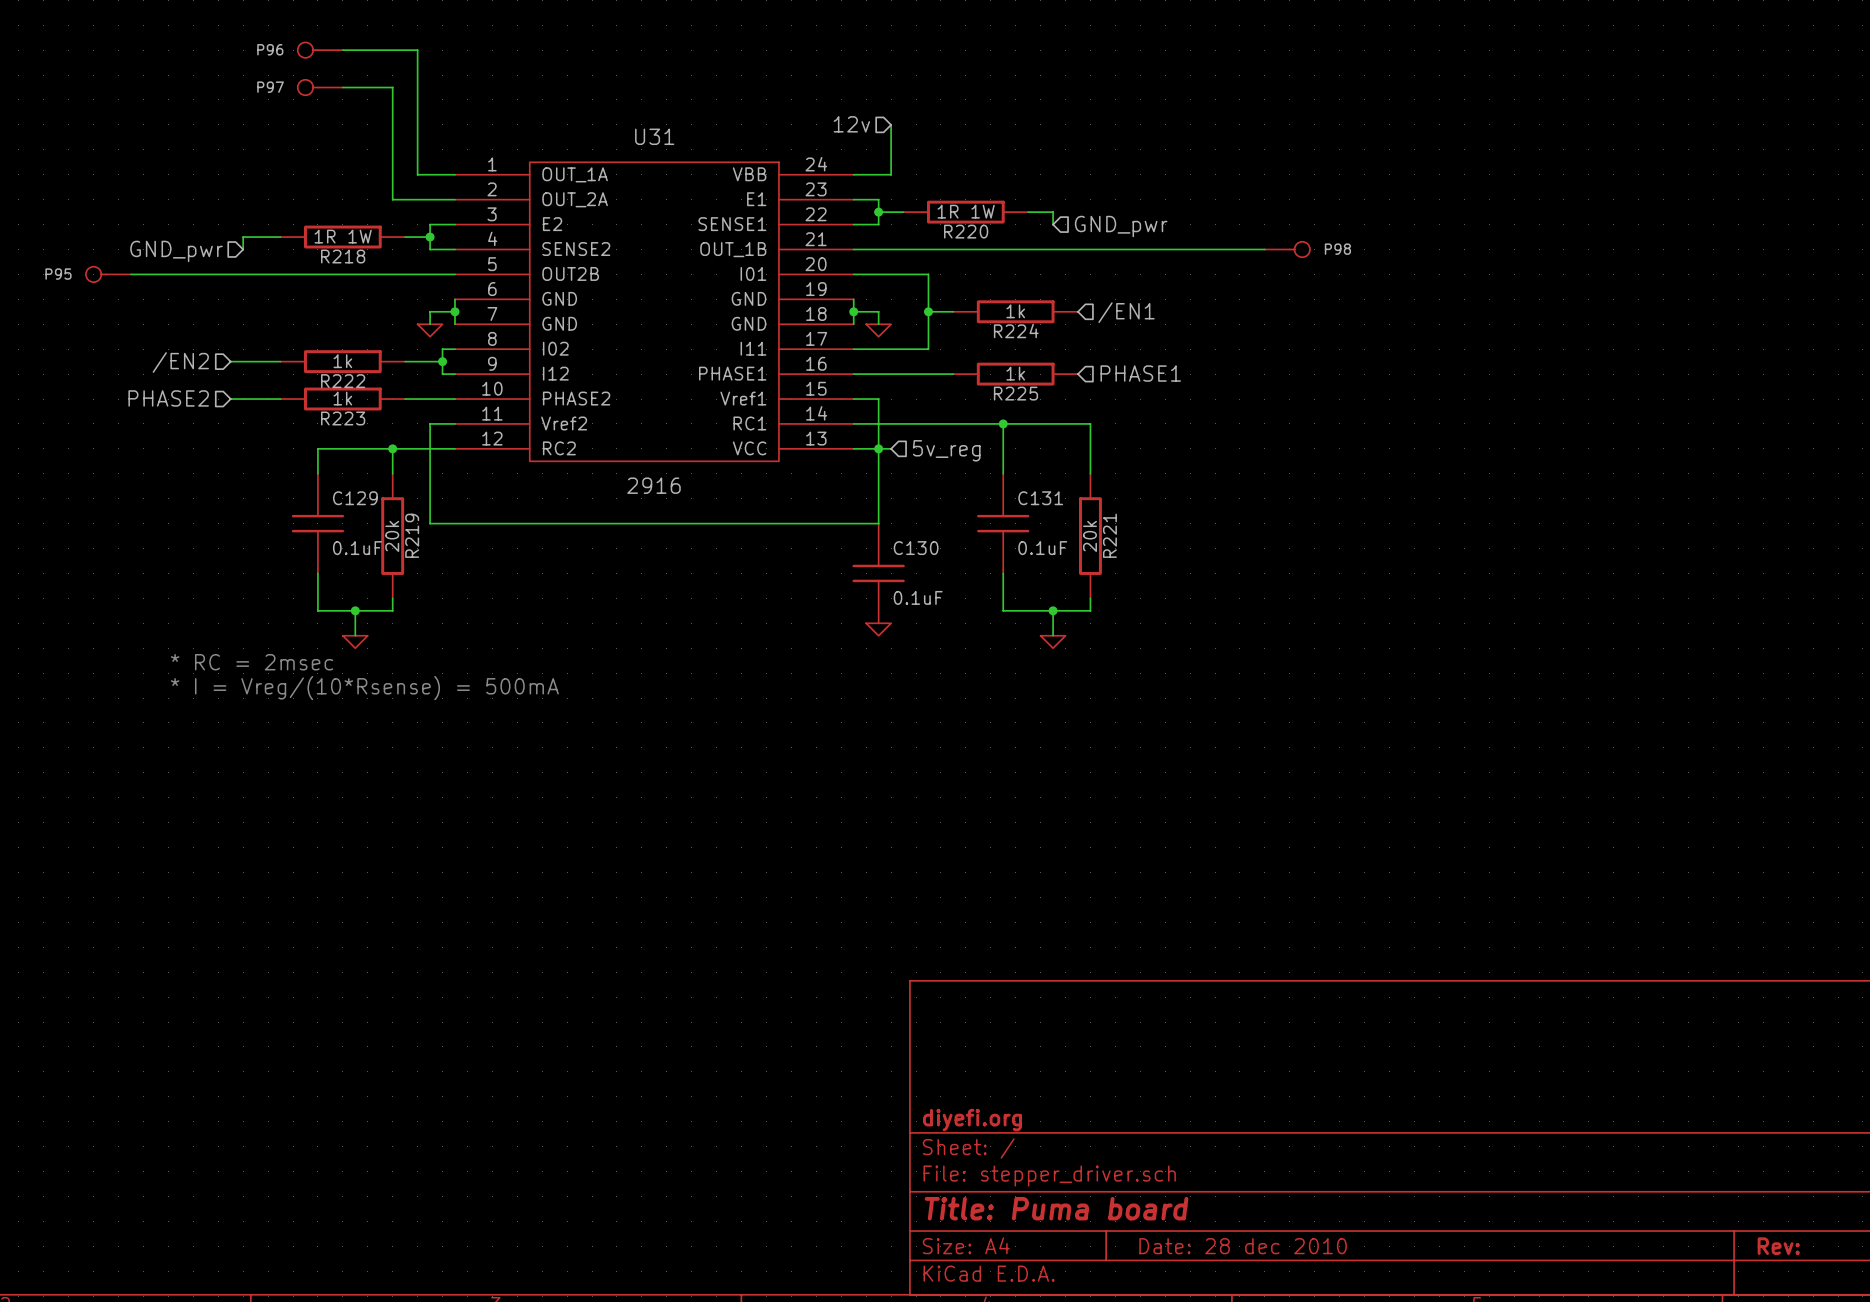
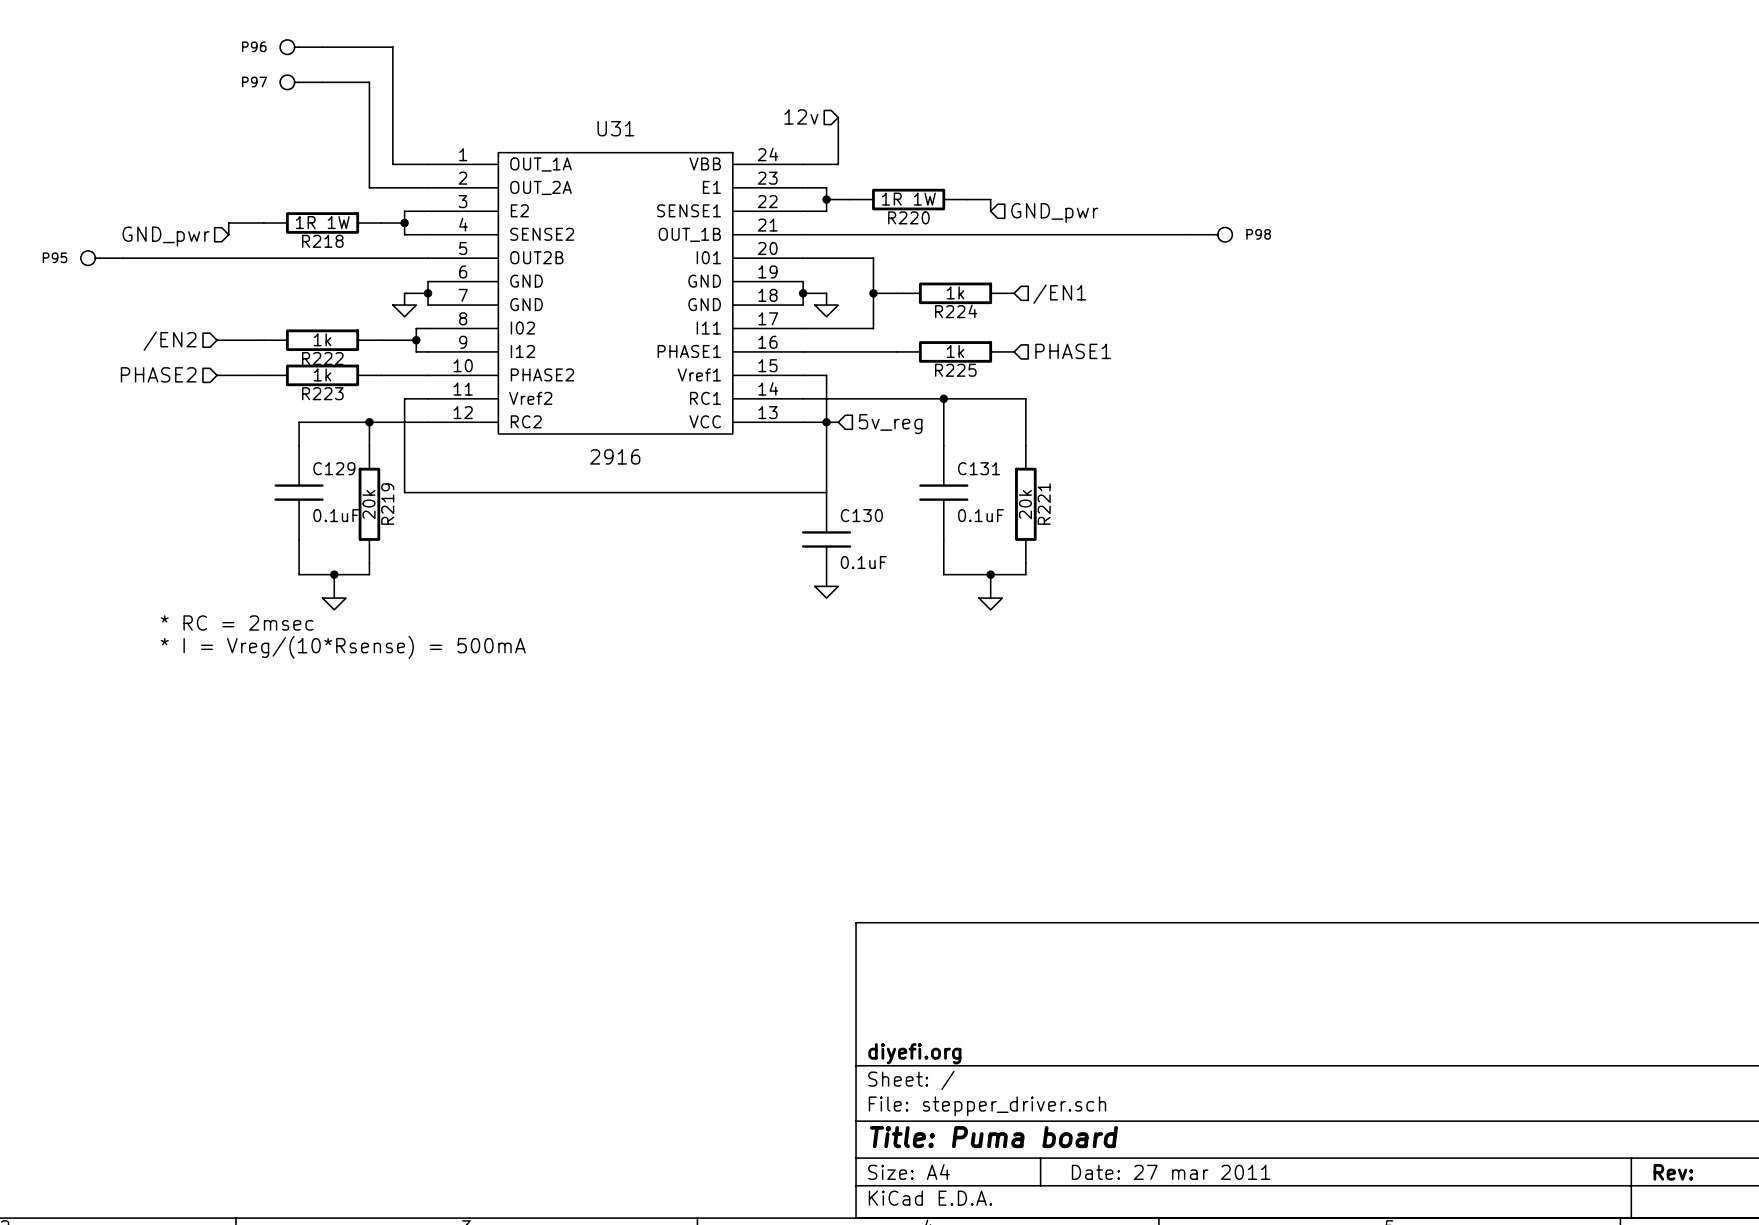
title block: Date: 28 dec 2010 (1243, 1246) -> Date: 27 mar 2011 (1171, 1172)

